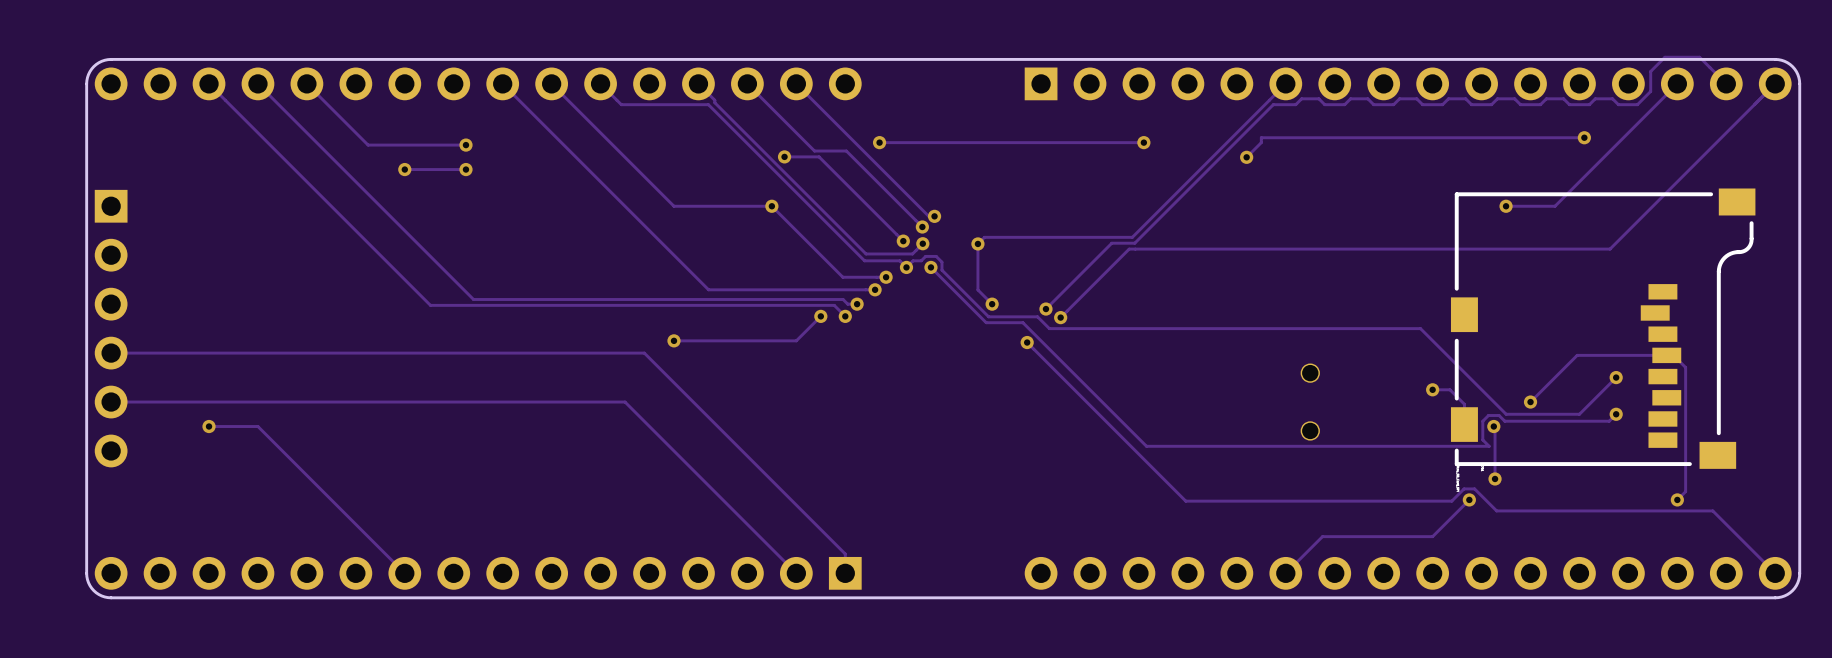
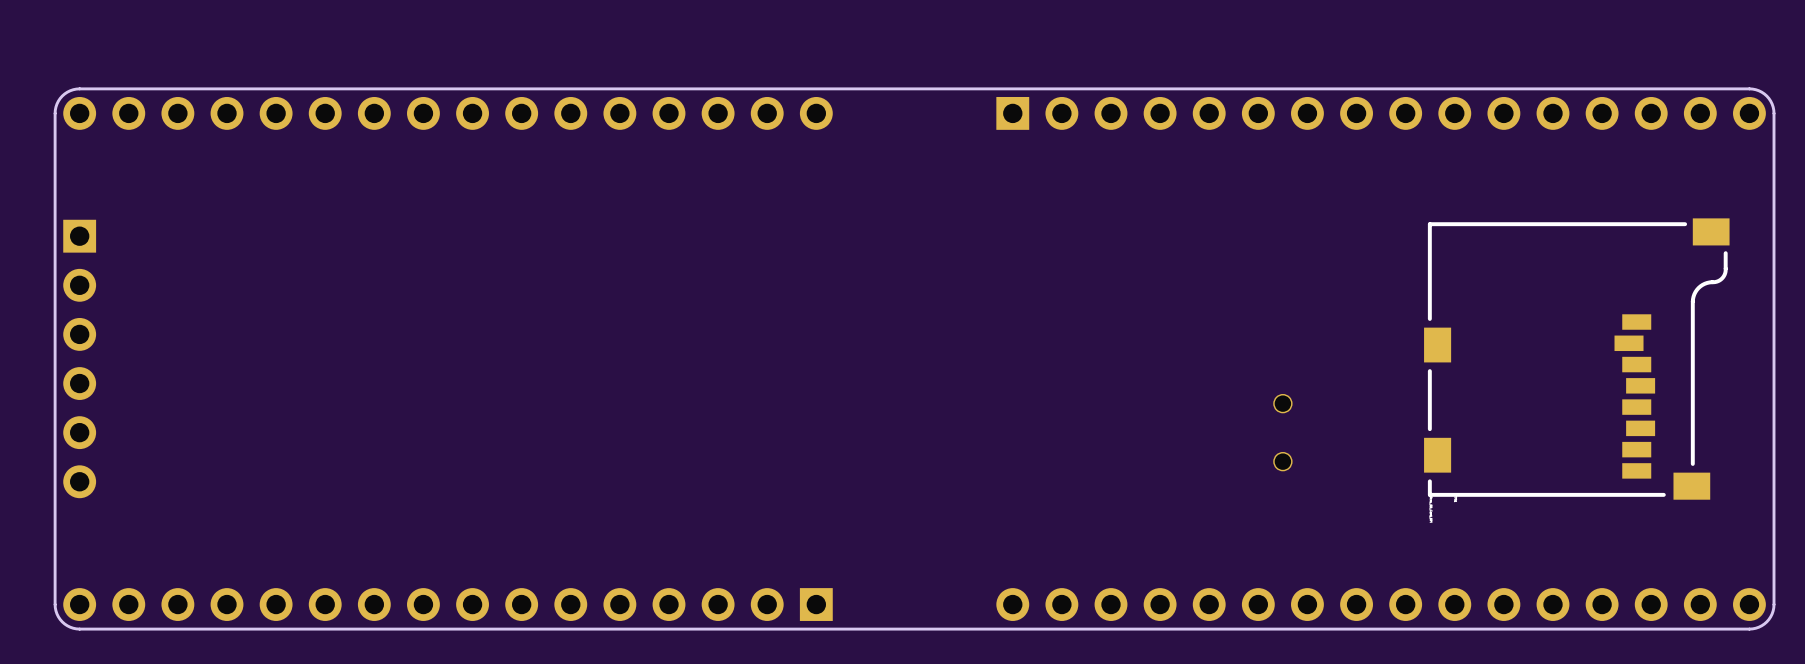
track: (209, 83) (430, 305) (834, 305) (845, 316) -> none
track: (257, 83) (473, 299) (843, 299) (847, 304) (857, 304) -> none
track: (306, 83) (368, 145) (465, 145) -> none
track: (502, 83) (708, 289) (875, 289) -> none
track: (551, 83) (673, 206) (771, 206) (842, 277) (886, 277) -> none
track: (600, 83) (621, 104) (708, 104) (864, 260) (899, 260) (906, 267) (913, 260) (921, 260) (925, 256) (936, 256) (941, 262) (941, 270) (988, 316) (1037, 316) (1049, 328) (1420, 328) (1506, 414) (1579, 414) (1616, 377) -> none
track: (698, 83) (714, 100) (714, 102) (866, 253) (912, 253) (922, 243) -> none
track: (747, 83) (814, 151) (846, 151) (922, 227) -> none
track: (796, 83) (928, 216) (934, 216) -> none
track: (1285, 83) (1132, 237) (984, 237) (977, 243) (977, 289) (992, 304) -> none
track: (1677, 83) (1555, 206) (1506, 206) -> none
track: (1726, 83) (1699, 57) (1664, 57) (1650, 71) (1650, 91) (1637, 104) (1618, 104) (1612, 98) (1595, 98) (1589, 104) (1569, 104) (1563, 98) (1546, 98) (1540, 104) (1520, 104) (1514, 98) (1497, 98) (1491, 104) (1471, 104) (1465, 98) (1448, 98) (1442, 104) (1422, 104) (1416, 98) (1399, 98) (1393, 104) (1373, 104) (1367, 98) (1350, 98) (1344, 104) (1324, 104) (1318, 98) (1301, 98) (1295, 104) (1273, 104) (1134, 243) (1111, 243) (1045, 309) -> none
track: (1775, 83) (1610, 249) (1129, 249) (1060, 317) -> none
track: (1584, 137) (1261, 137) (1261, 142) (1246, 157) -> none
via: (1584, 137) -> none
via: (879, 142) -> none
track: (1143, 142) (879, 142) -> none
via: (1143, 142) -> none
via: (465, 145) -> none
track: (784, 156) (819, 156) (903, 241) -> none
via: (784, 156) -> none
via: (1246, 157) -> none
via: (404, 169) -> none
track: (465, 169) (404, 169) -> none
via: (465, 169) -> none
via: (771, 206) -> none
via: (1506, 206) -> none
via: (934, 216) -> none
via: (922, 227) -> none
via: (903, 241) -> none
via: (922, 243) -> none
via: (977, 243) -> none
via: (906, 267) -> none
track: (930, 267) (986, 322) (1022, 322) (1146, 446) (1489, 446) (1482, 439) (1482, 421) (1488, 415) (1499, 415) (1504, 421) (1609, 421) (1616, 414) -> none
via: (930, 267) -> none
via: (886, 277) -> none
via: (875, 289) -> none
via: (857, 304) -> none
via: (992, 304) -> none
via: (1045, 309) -> none
track: (820, 316) (796, 340) (673, 340) -> none
via: (820, 316) -> none
via: (845, 316) -> none
via: (1060, 317) -> none
via: (673, 340) -> none
track: (1027, 342) (1185, 501) (1451, 501) (1464, 488) (1474, 488) (1496, 510) (1712, 510) (1775, 573) -> none
via: (1027, 342) -> none
track: (111, 353) (644, 353) (845, 554) (845, 573) -> none
via: (1616, 377) -> none
track: (1432, 389) (1449, 389) (1464, 404) (1464, 424) -> none
via: (1432, 389) -> none
track: (111, 402) (625, 402) (796, 573) -> none
track: (1530, 402) (1577, 355) (1673, 355) (1685, 367) (1685, 491) (1677, 499) -> none
via: (1530, 402) -> none
via: (1616, 414) -> none
track: (209, 426) (257, 426) (404, 573) -> none
via: (209, 426) -> none
track: (1493, 426) (1495, 478) -> none
via: (1493, 426) -> none
via: (1495, 478) -> none
track: (1469, 499) (1432, 536) (1322, 536) (1285, 573) -> none
via: (1469, 499) -> none
via: (1677, 499) -> none

